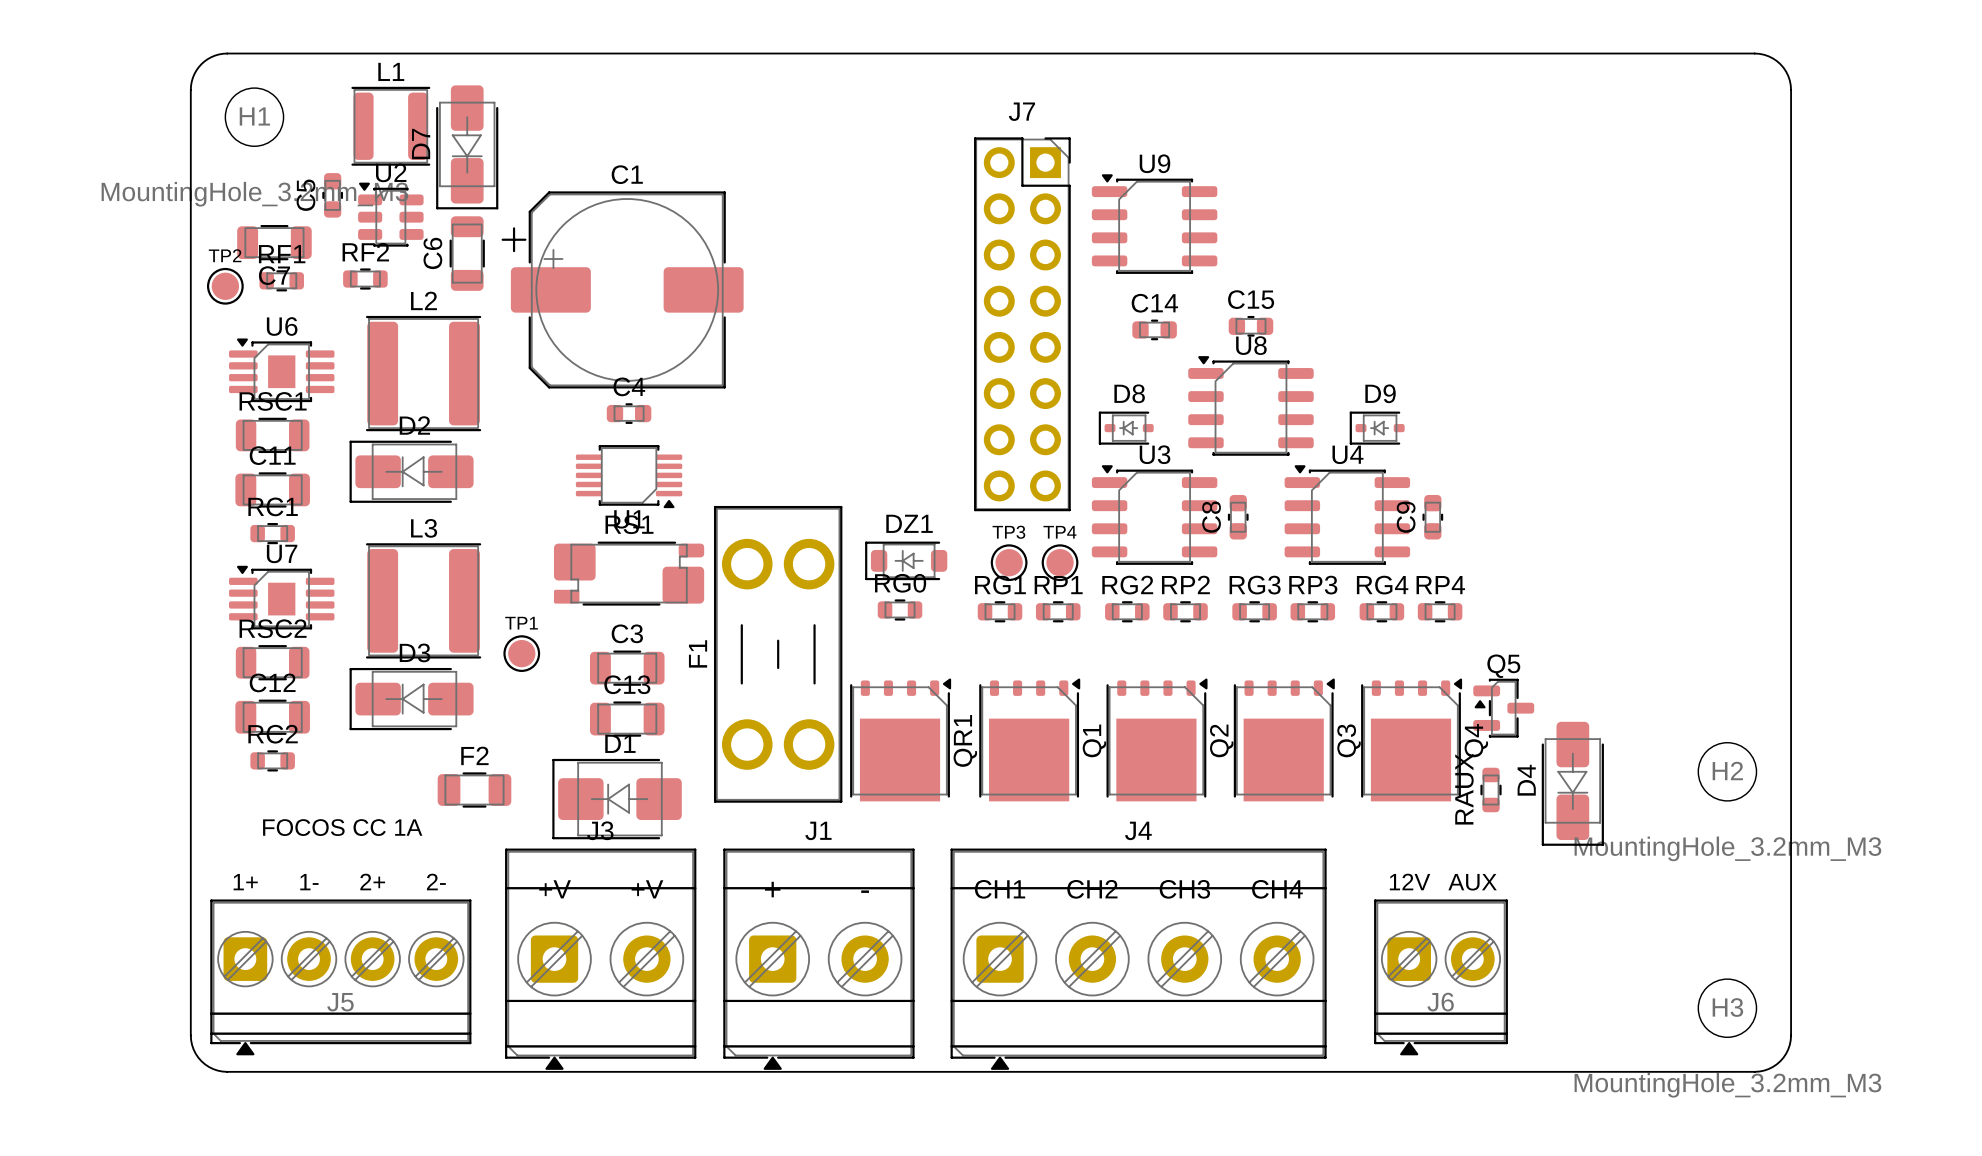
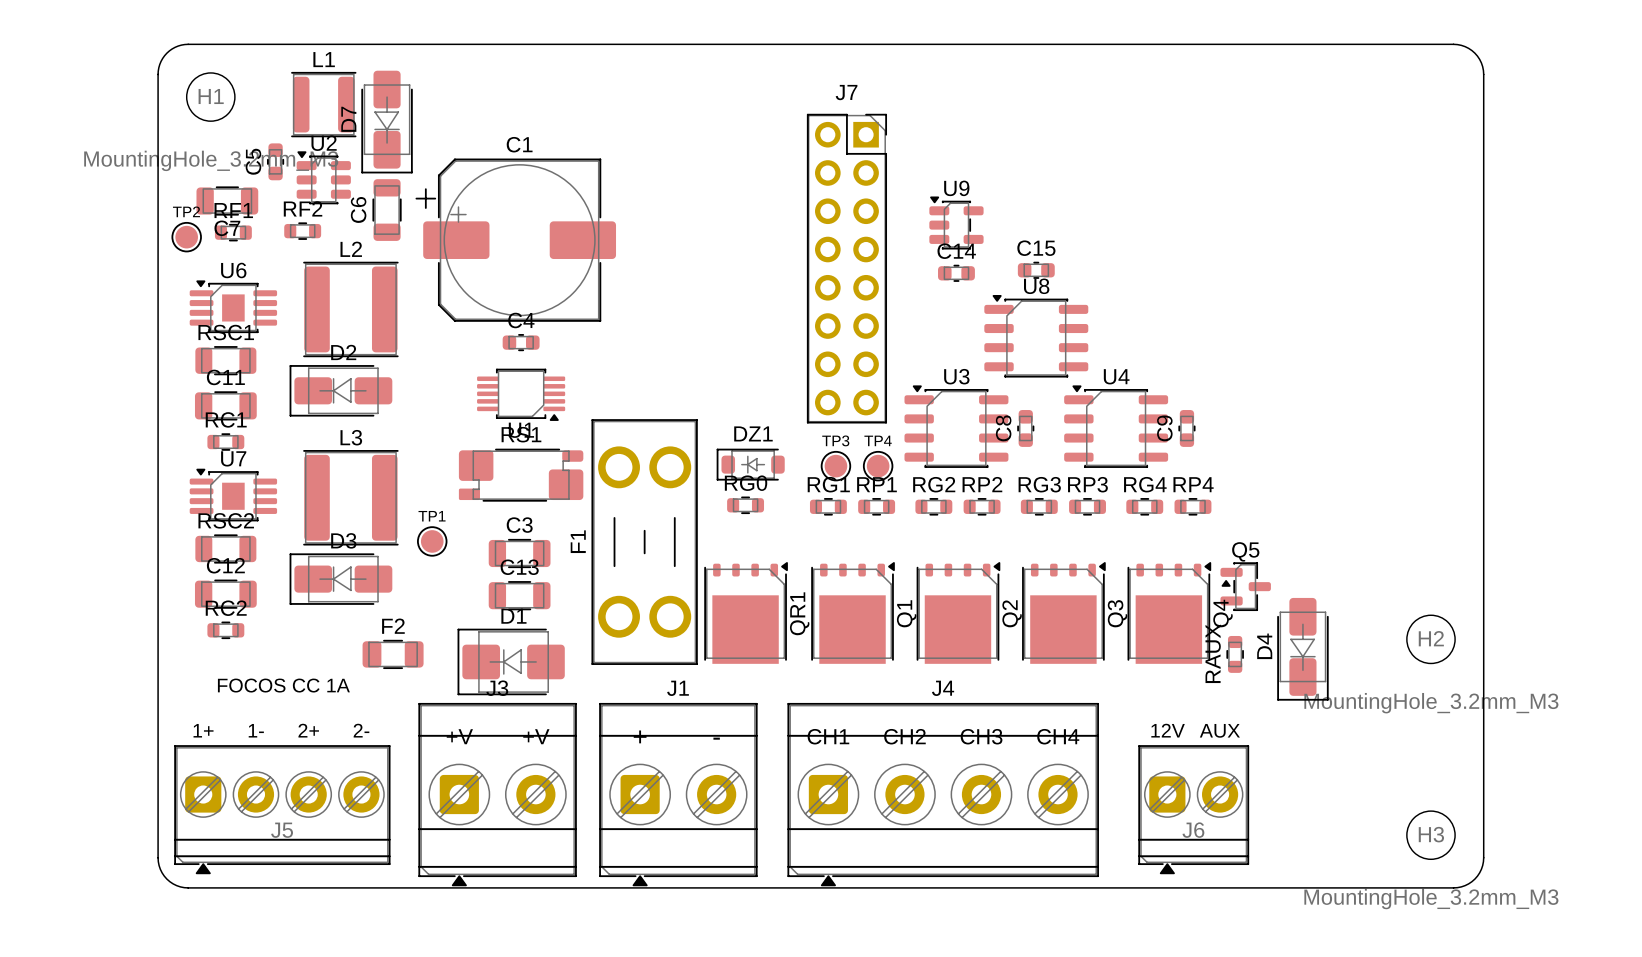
U9 footprint: [1091, 174, 1218, 274] -> [929, 196, 984, 250]
D8: (1126, 428) -> none
D9: (1377, 428) -> none

